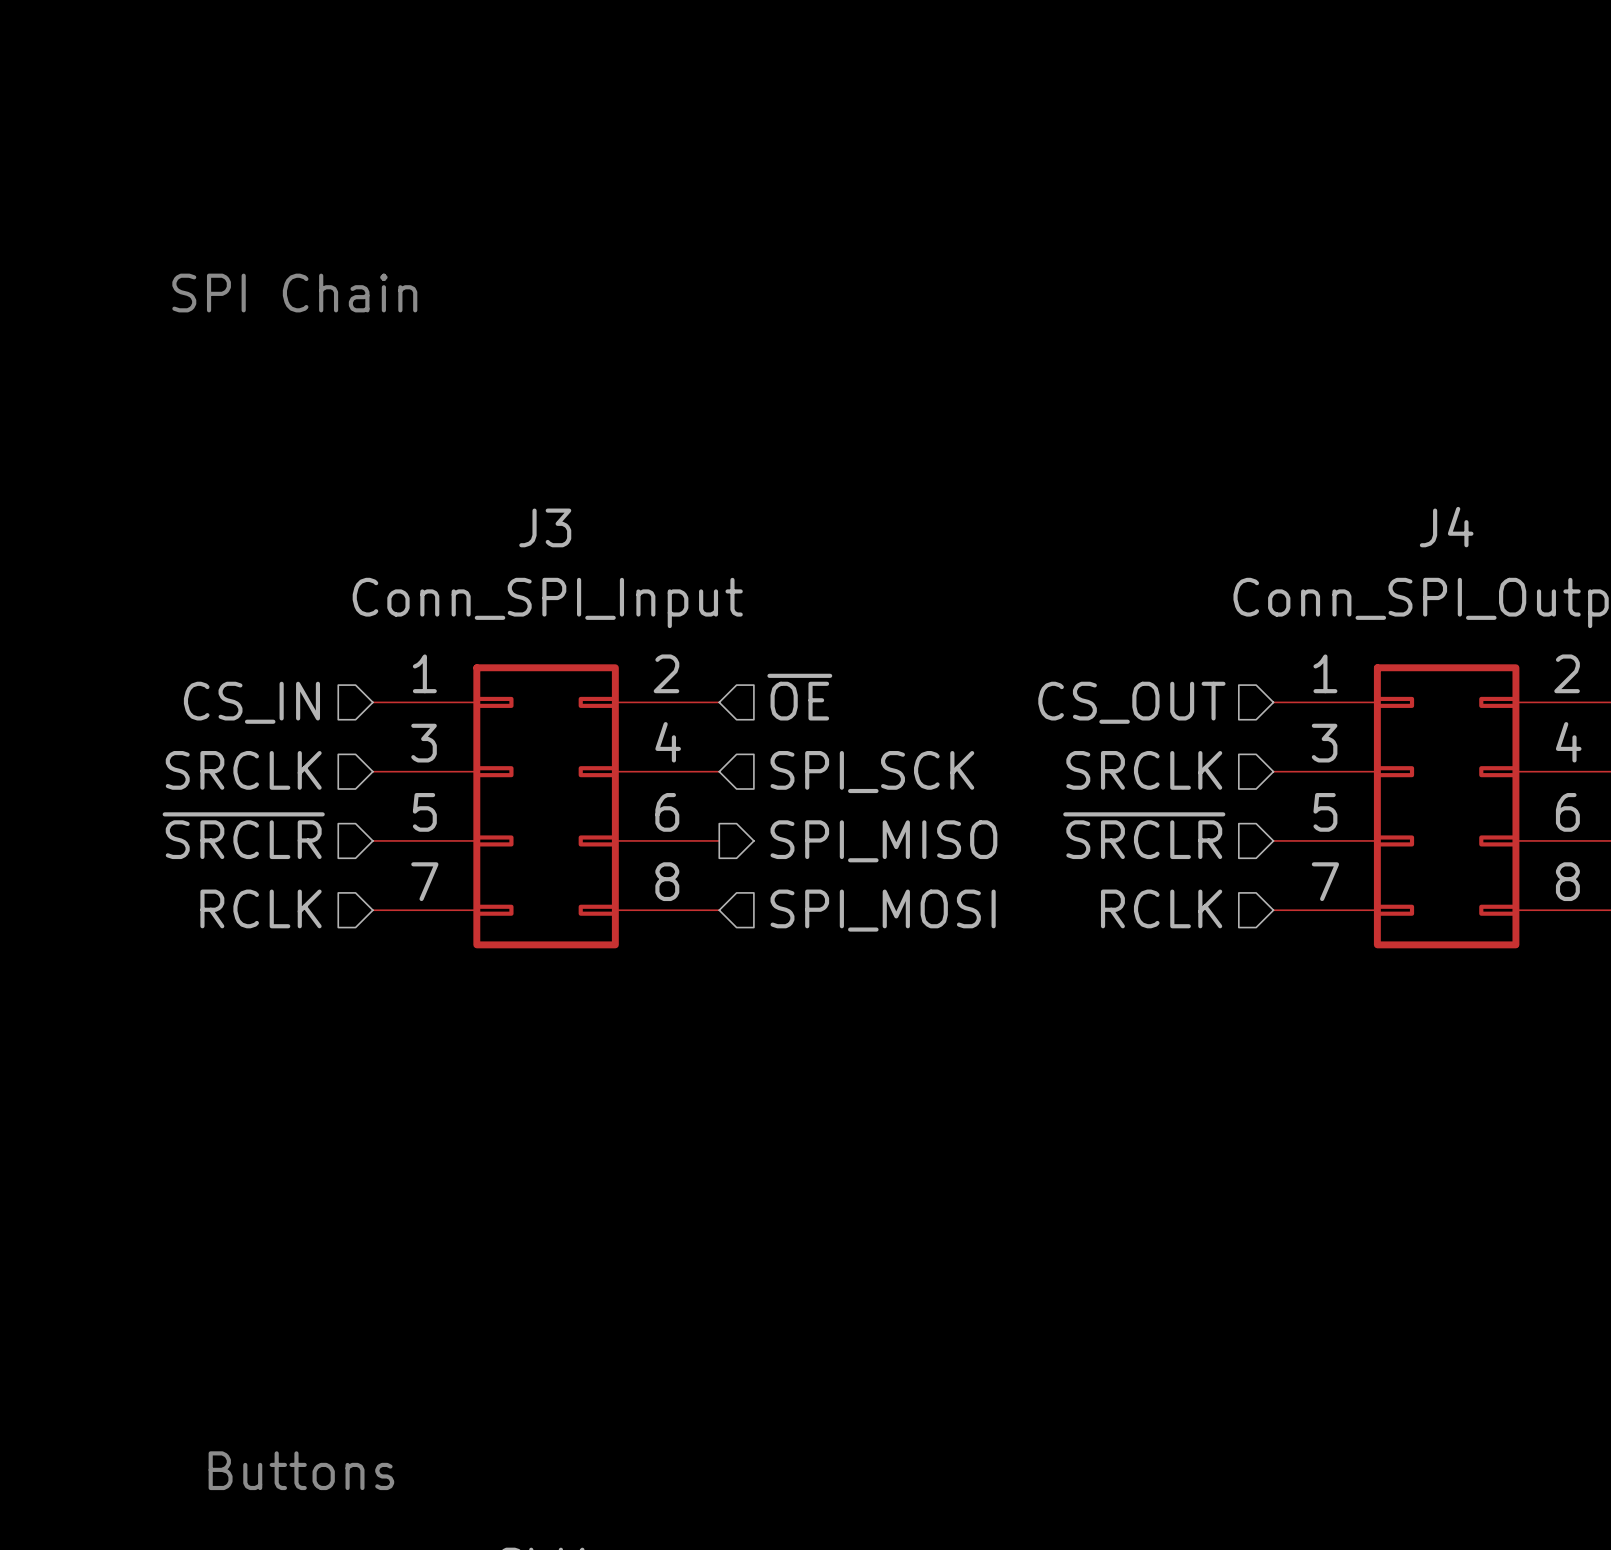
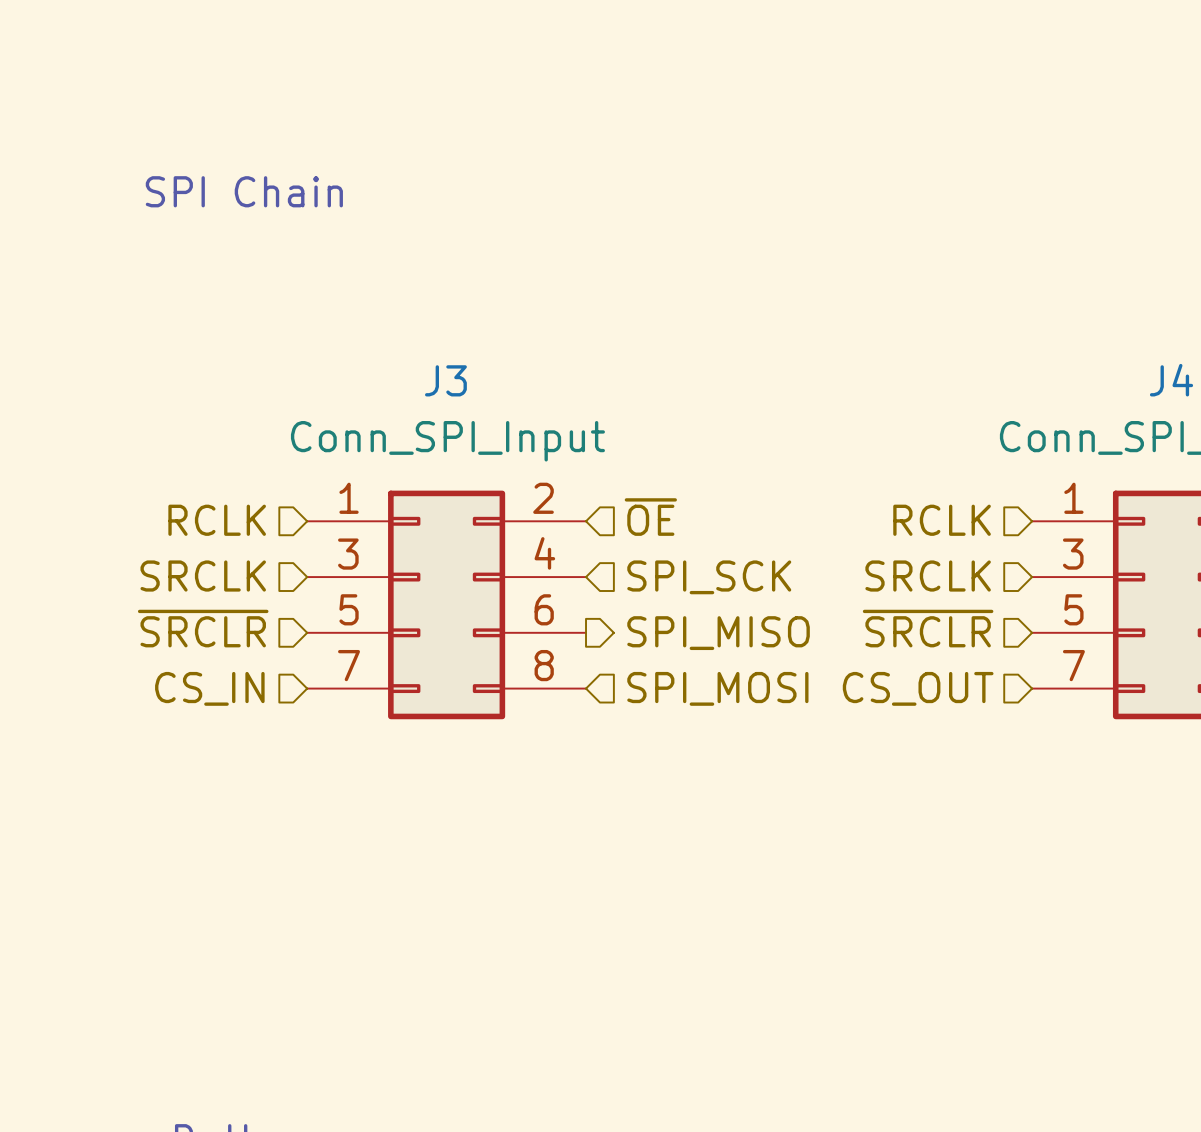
hierarchical label: CS_IN (251, 702) -> RCLK (217, 520)
hierarchical label: CS_OUT (1131, 702) -> RCLK (942, 520)
hierarchical label: RCLK (261, 908) -> CS_IN (209, 688)
hierarchical label: RCLK (1161, 908) -> CS_OUT (918, 688)

